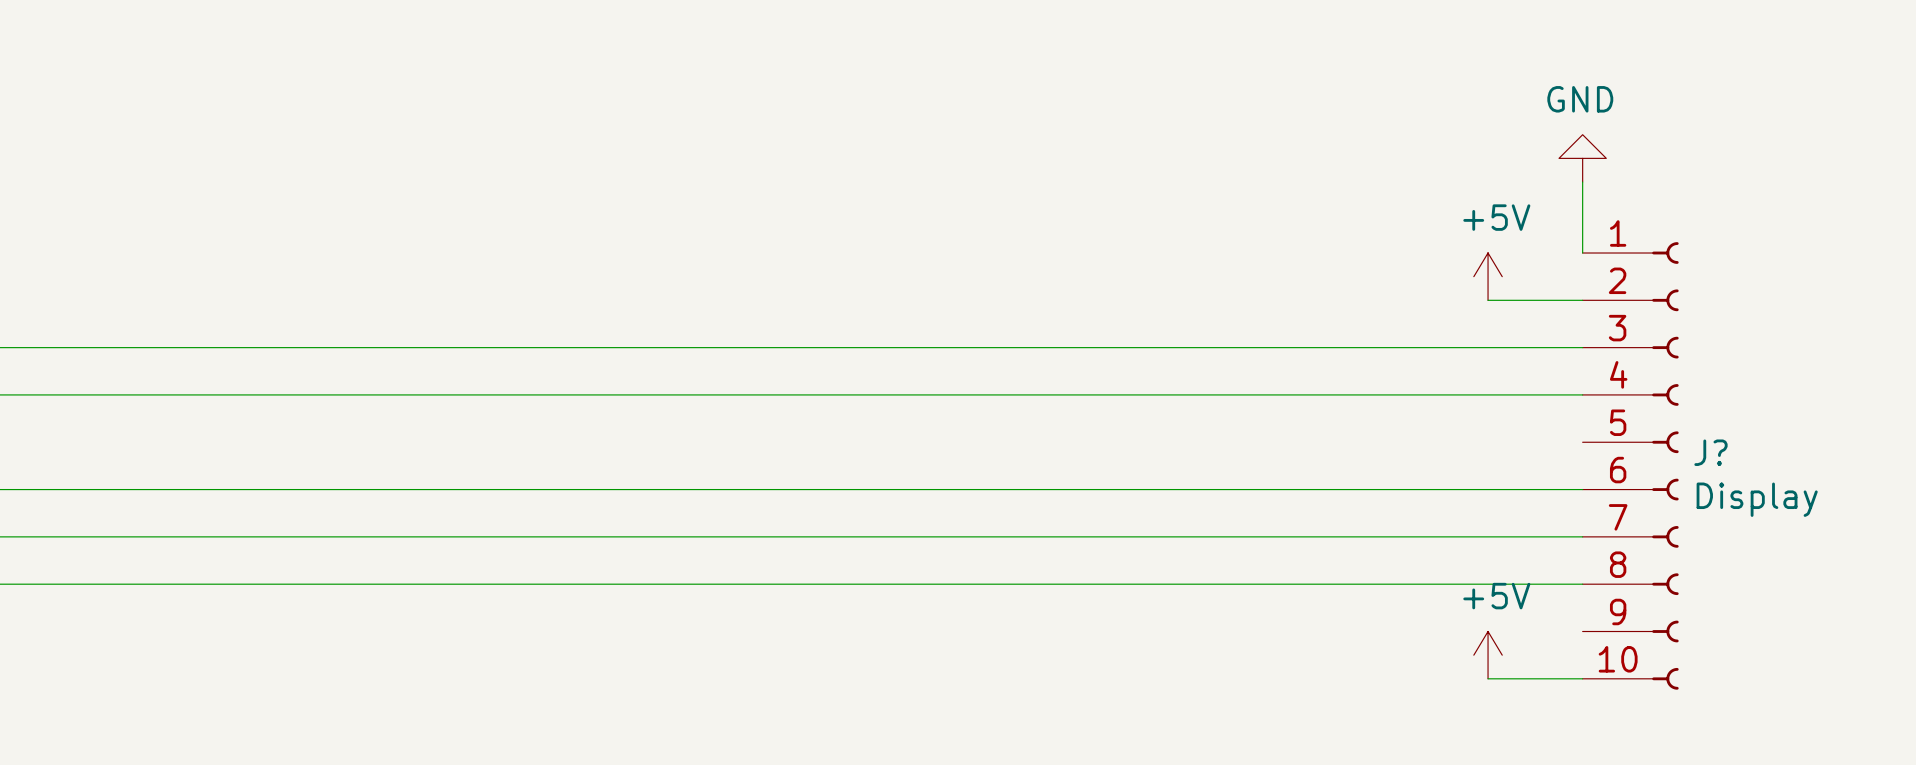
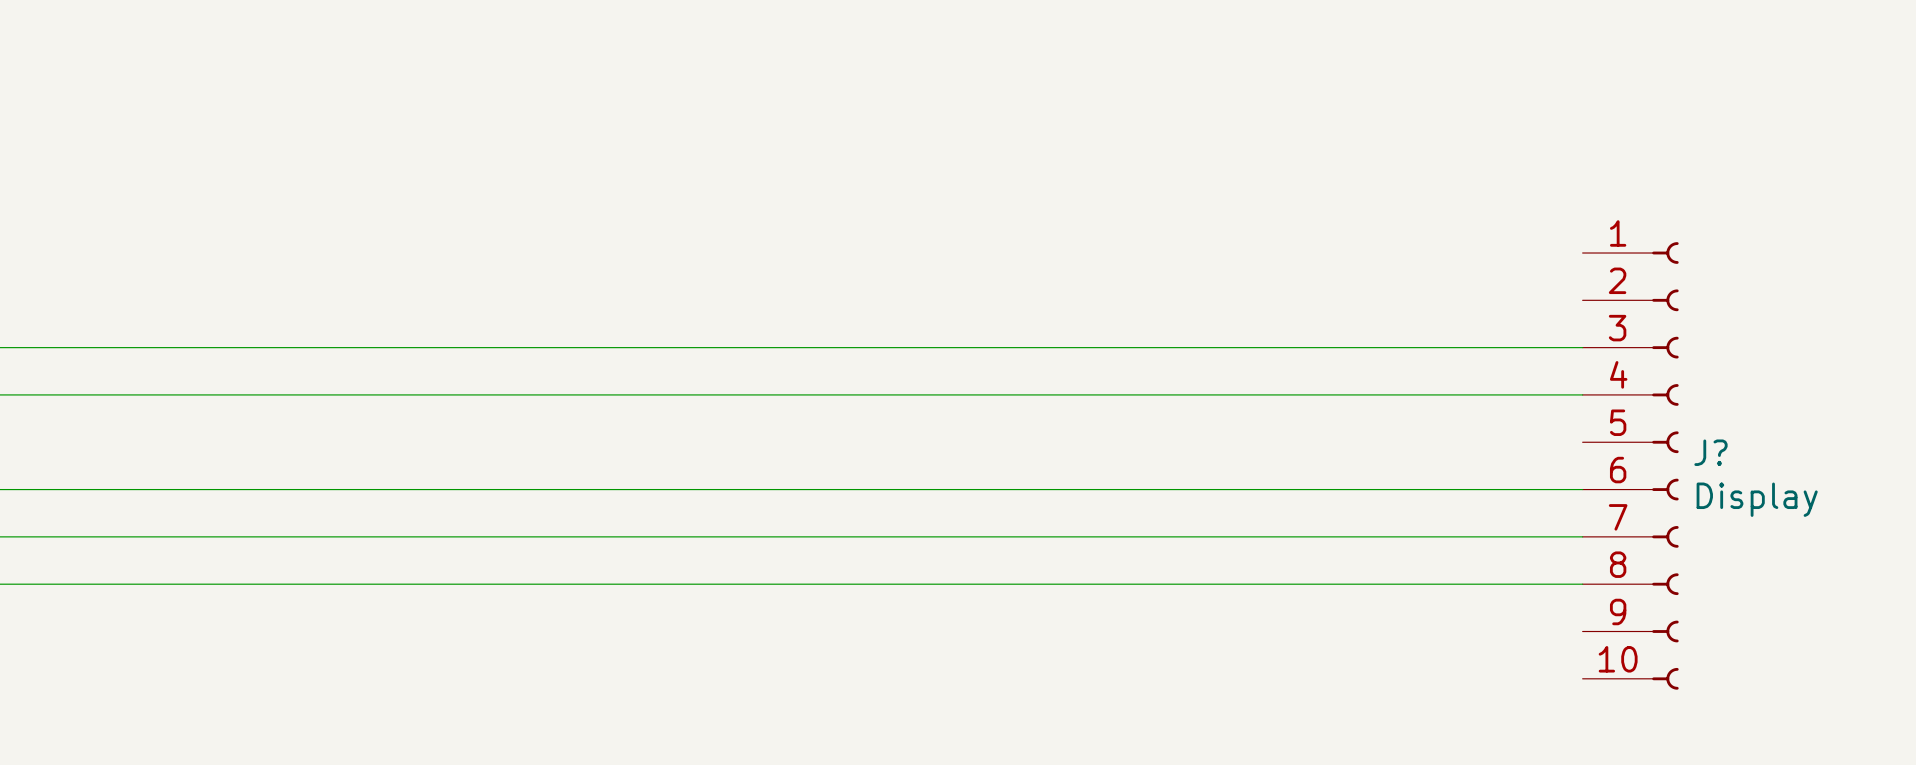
power symbol: GND (1582, 158) -> none
wire: (1582, 182) (1582, 253) -> none
power symbol: +5V (1488, 276) -> none
wire: (1488, 300) (1582, 300) -> none
power symbol: +5V (1488, 655) -> none
wire: (1488, 678) (1582, 678) -> none

